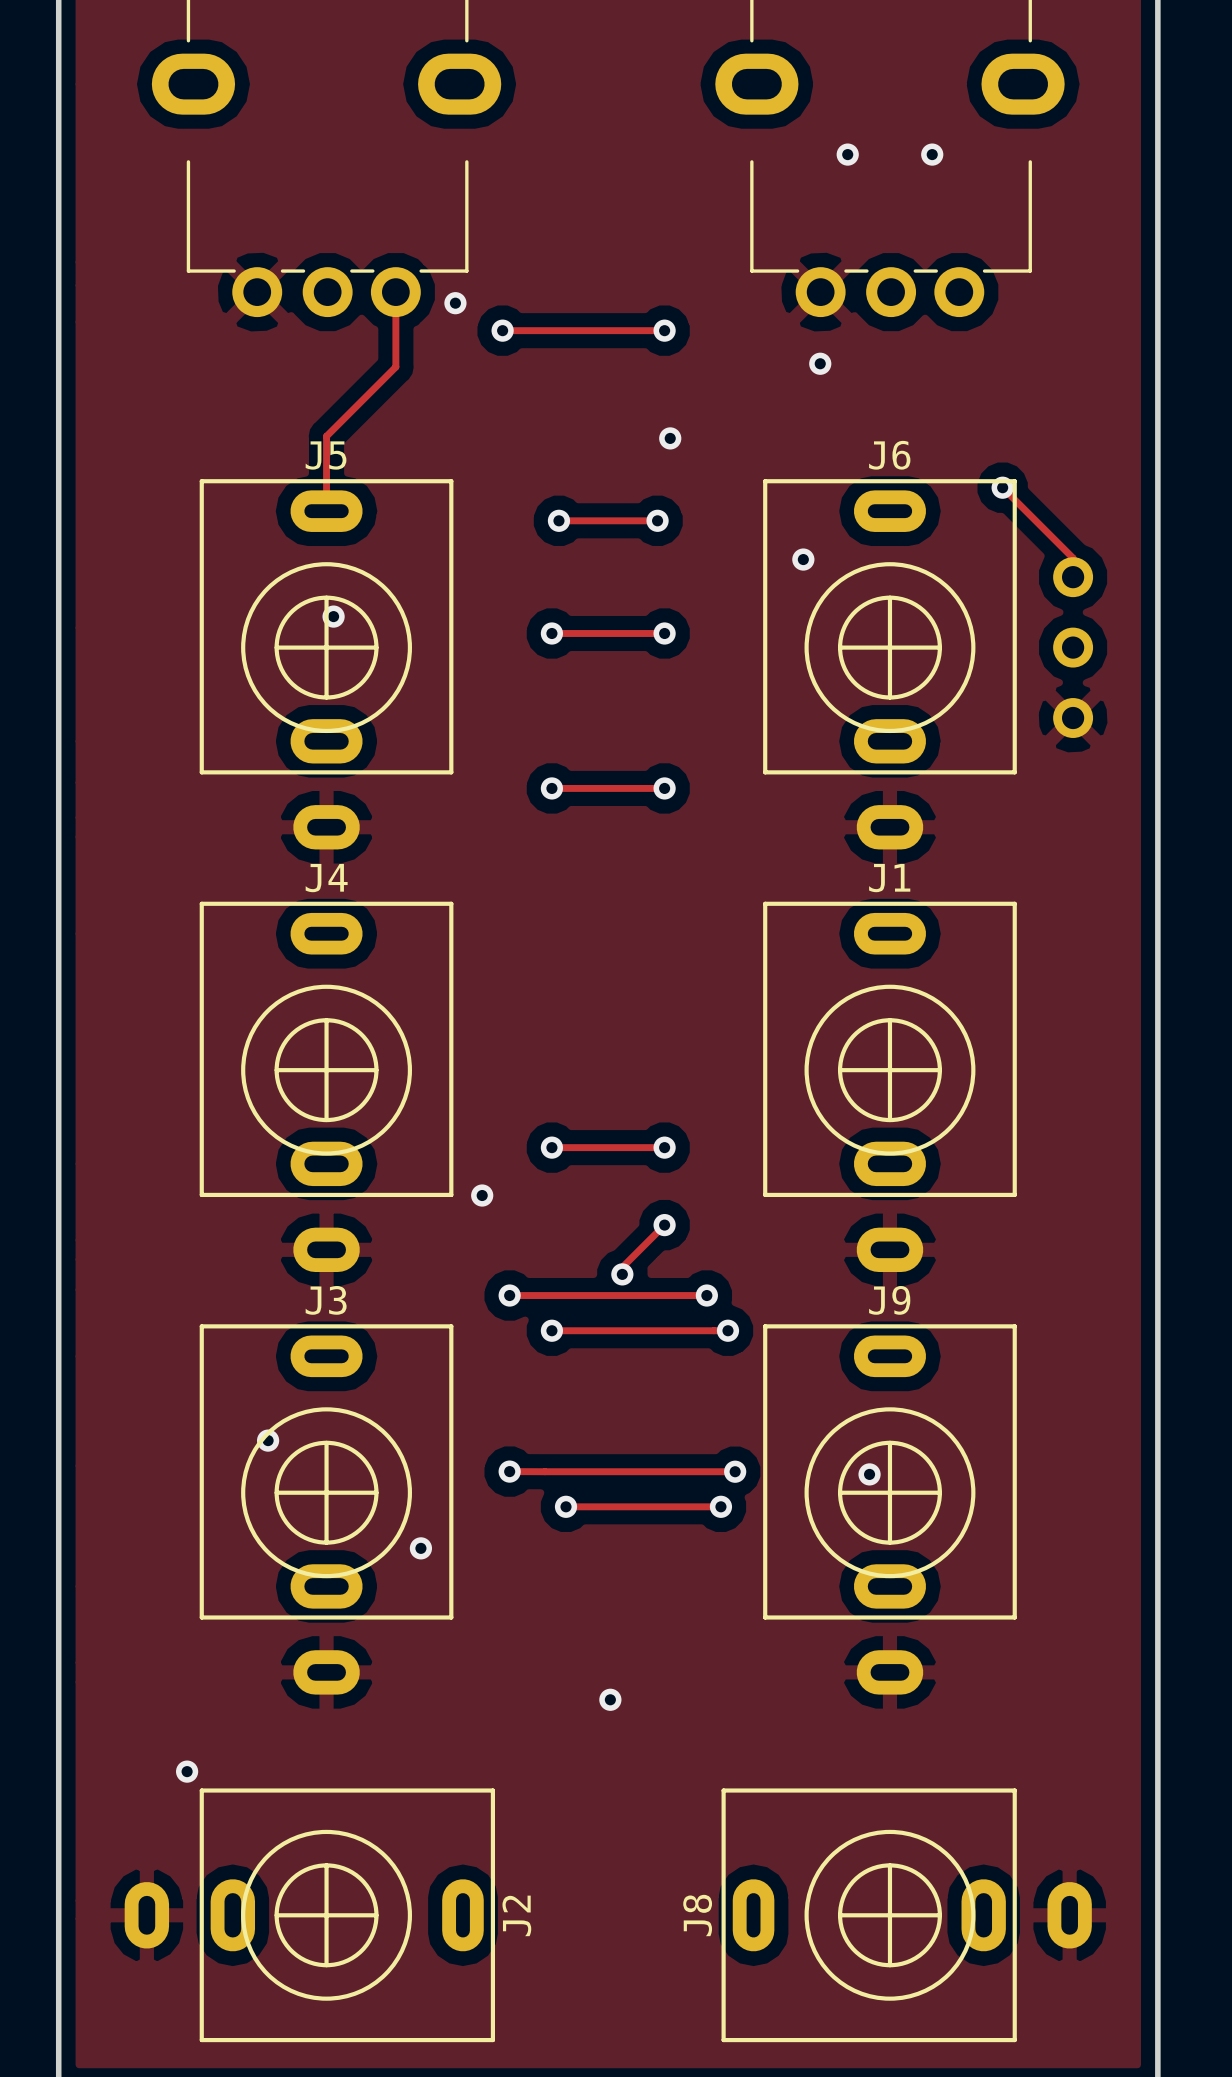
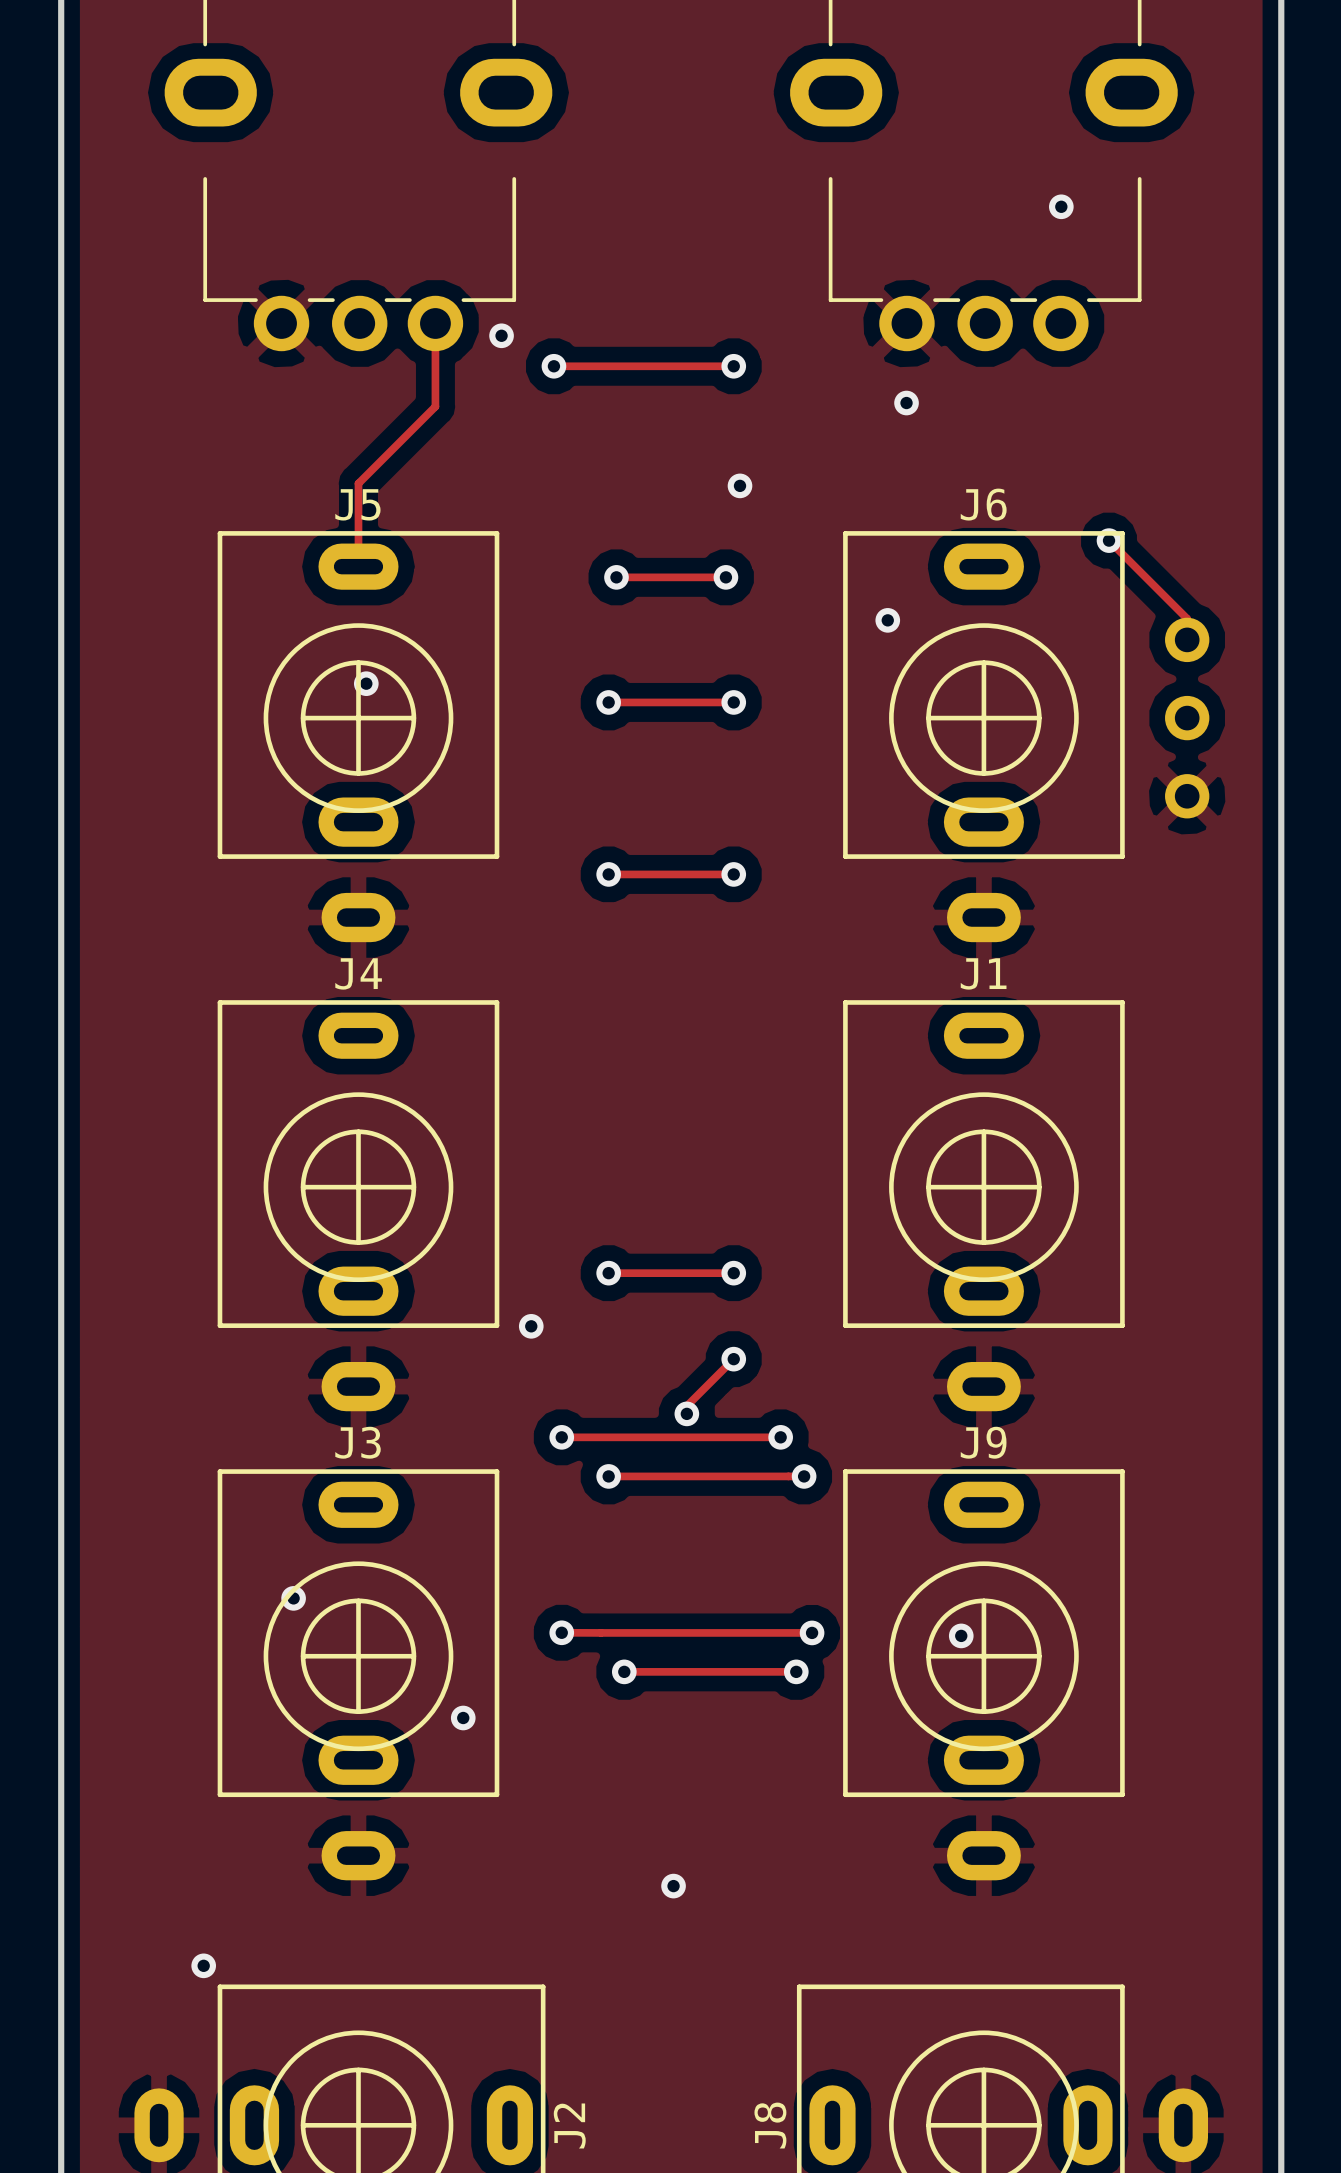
via: (847, 154) -> none
via position: (932, 154) -> (1061, 206)

